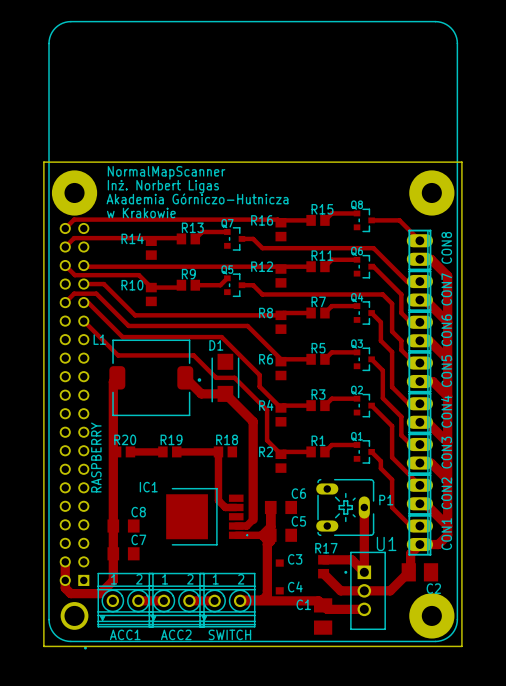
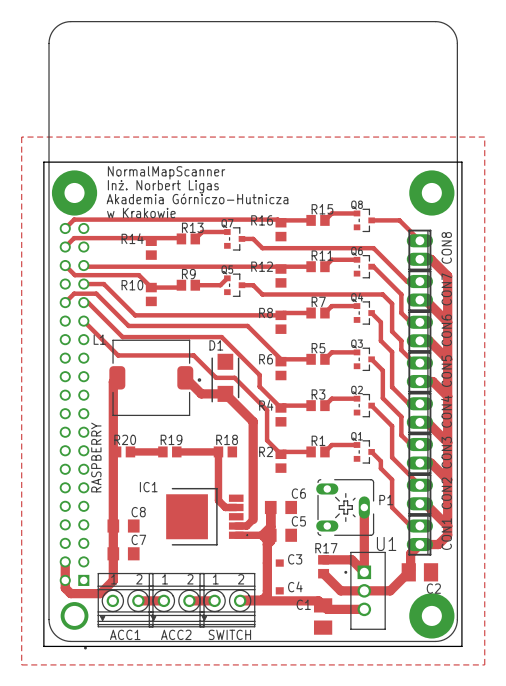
top zone outline: none -> (21, 137) (21, 664) (484, 664) (484, 137) (21, 137)

